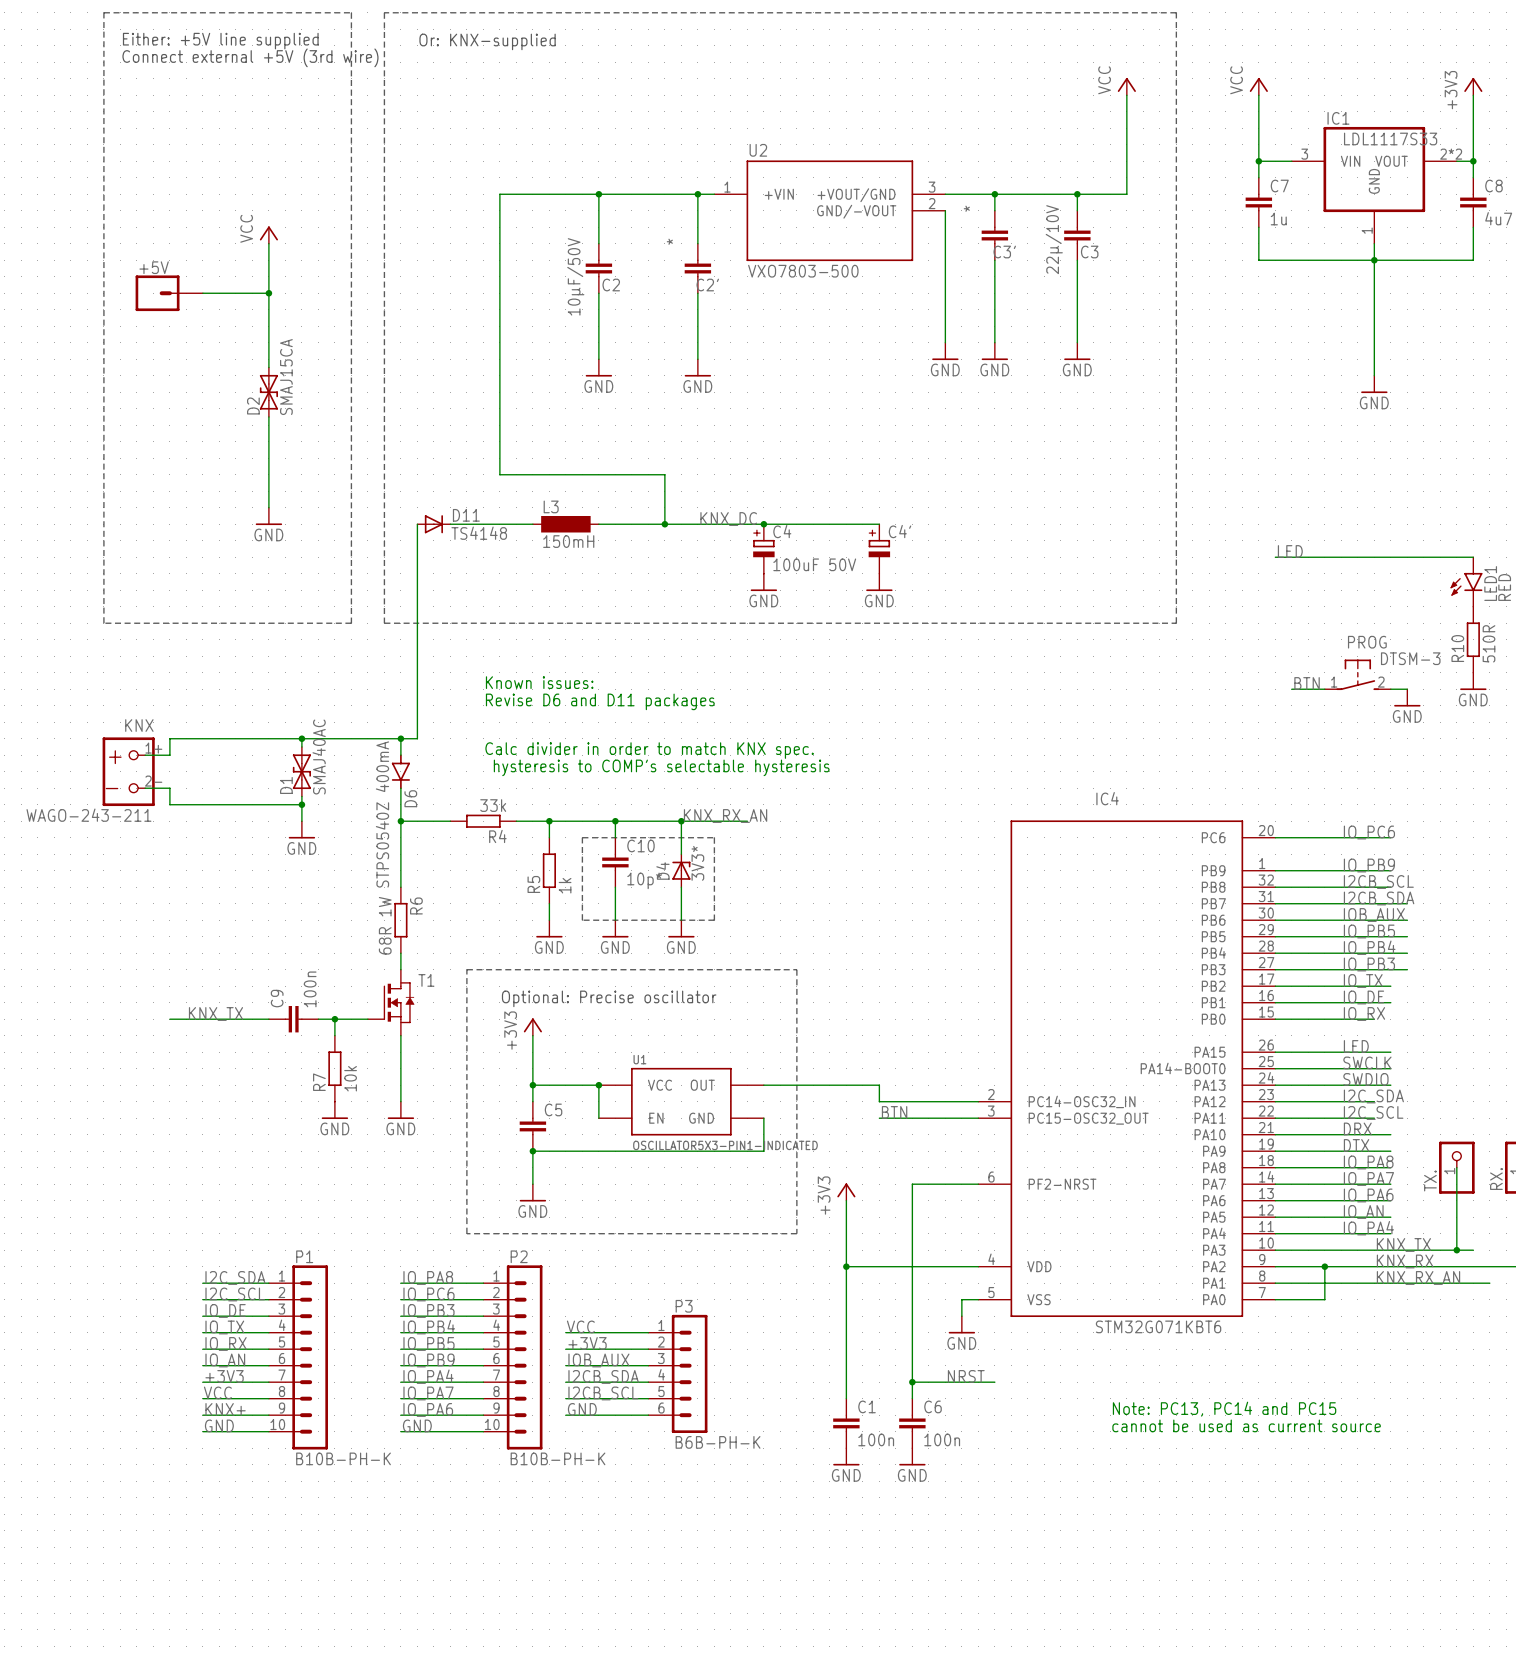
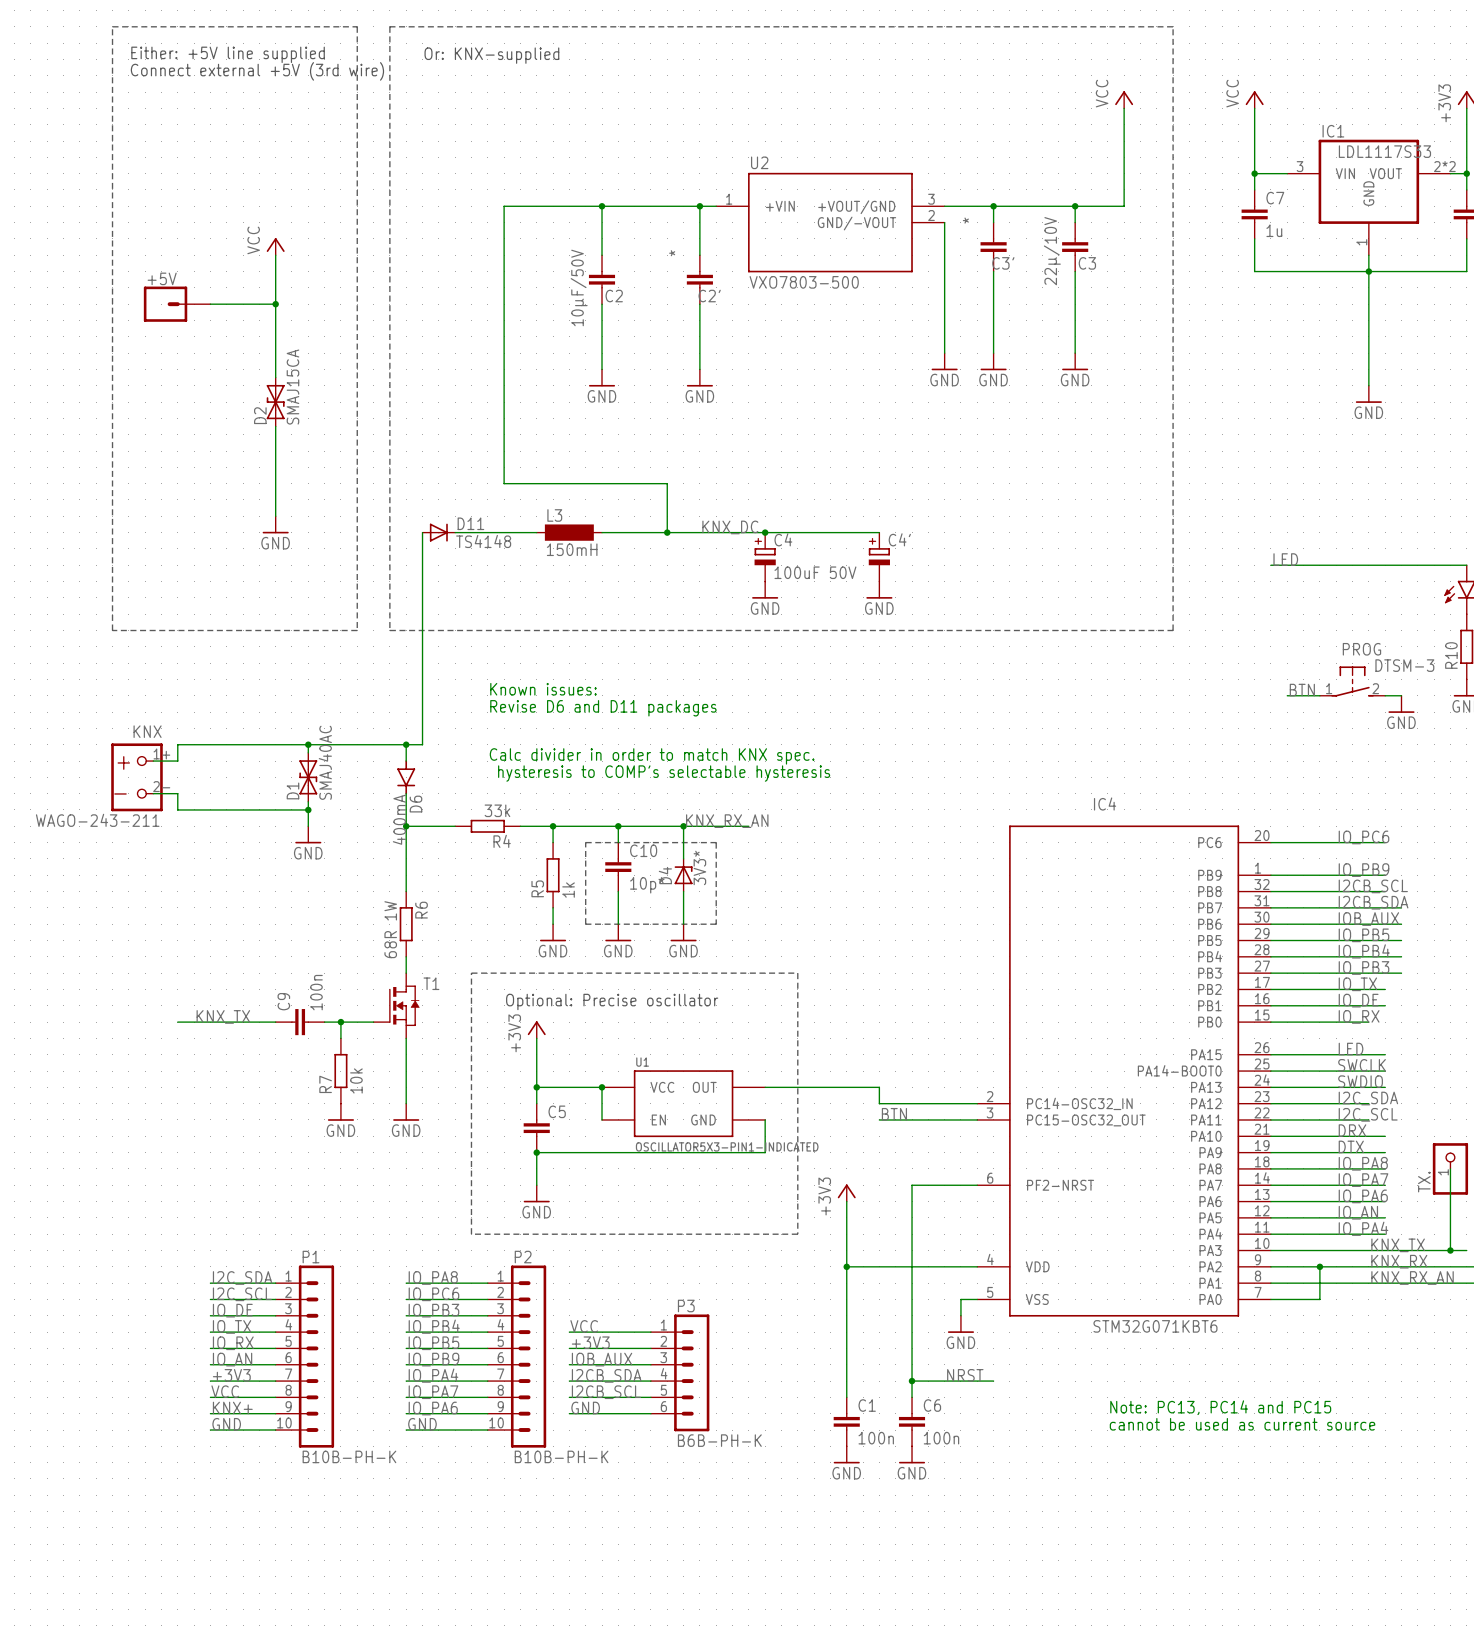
D6 value: STPS0540Z 400mA (382, 814) -> 400mA (399, 819)

